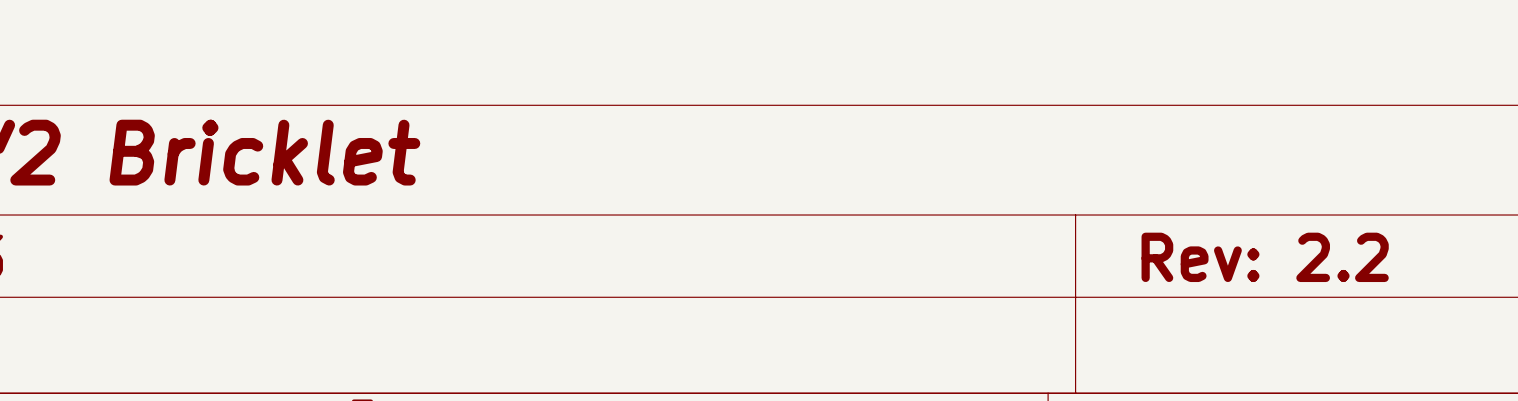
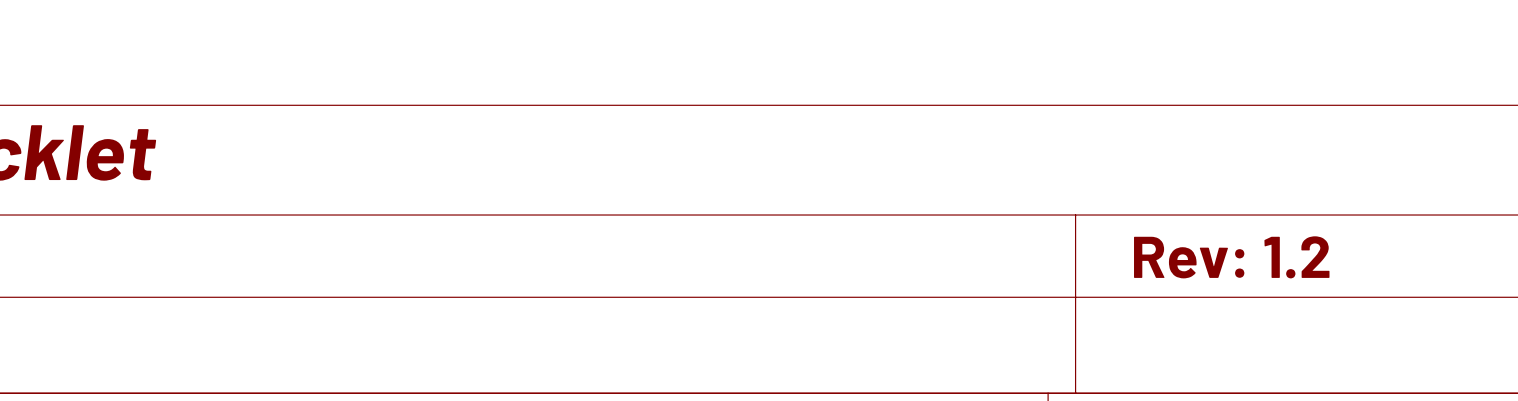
title block: Rev: 2.2 (1265, 257) -> Rev: 1.2 (1231, 257)

